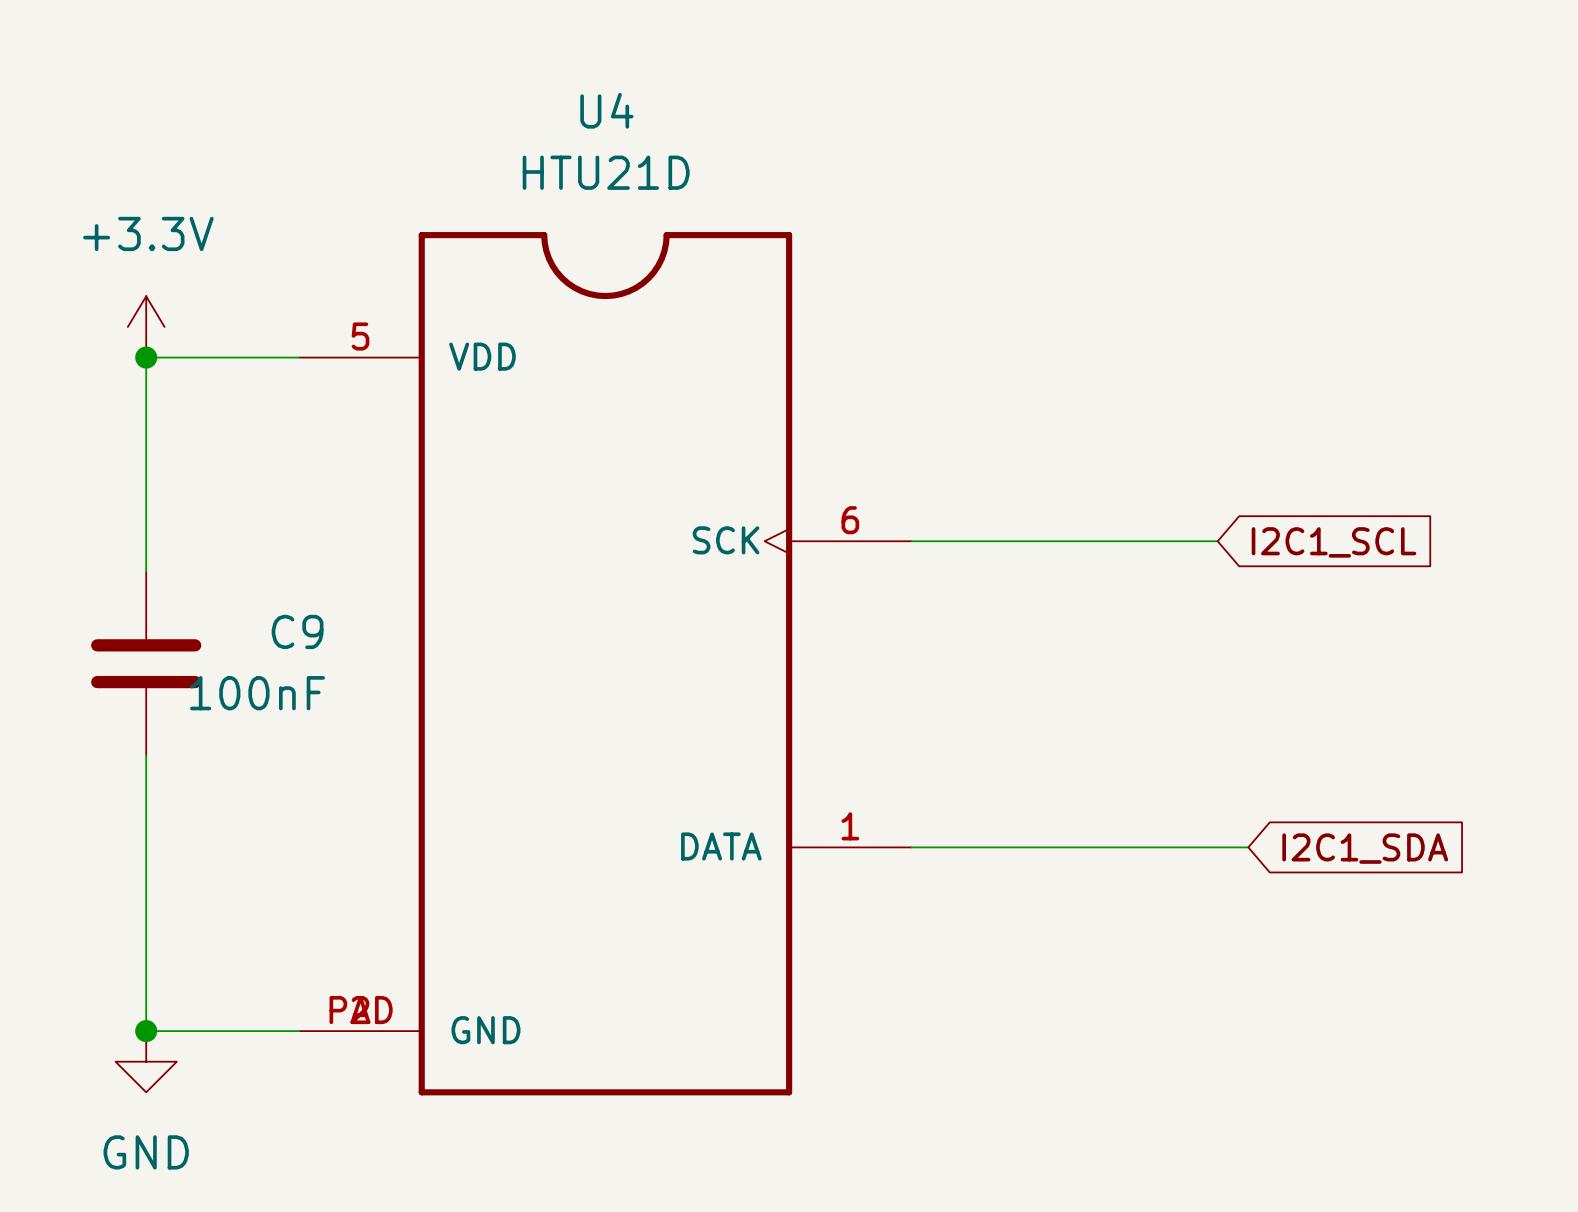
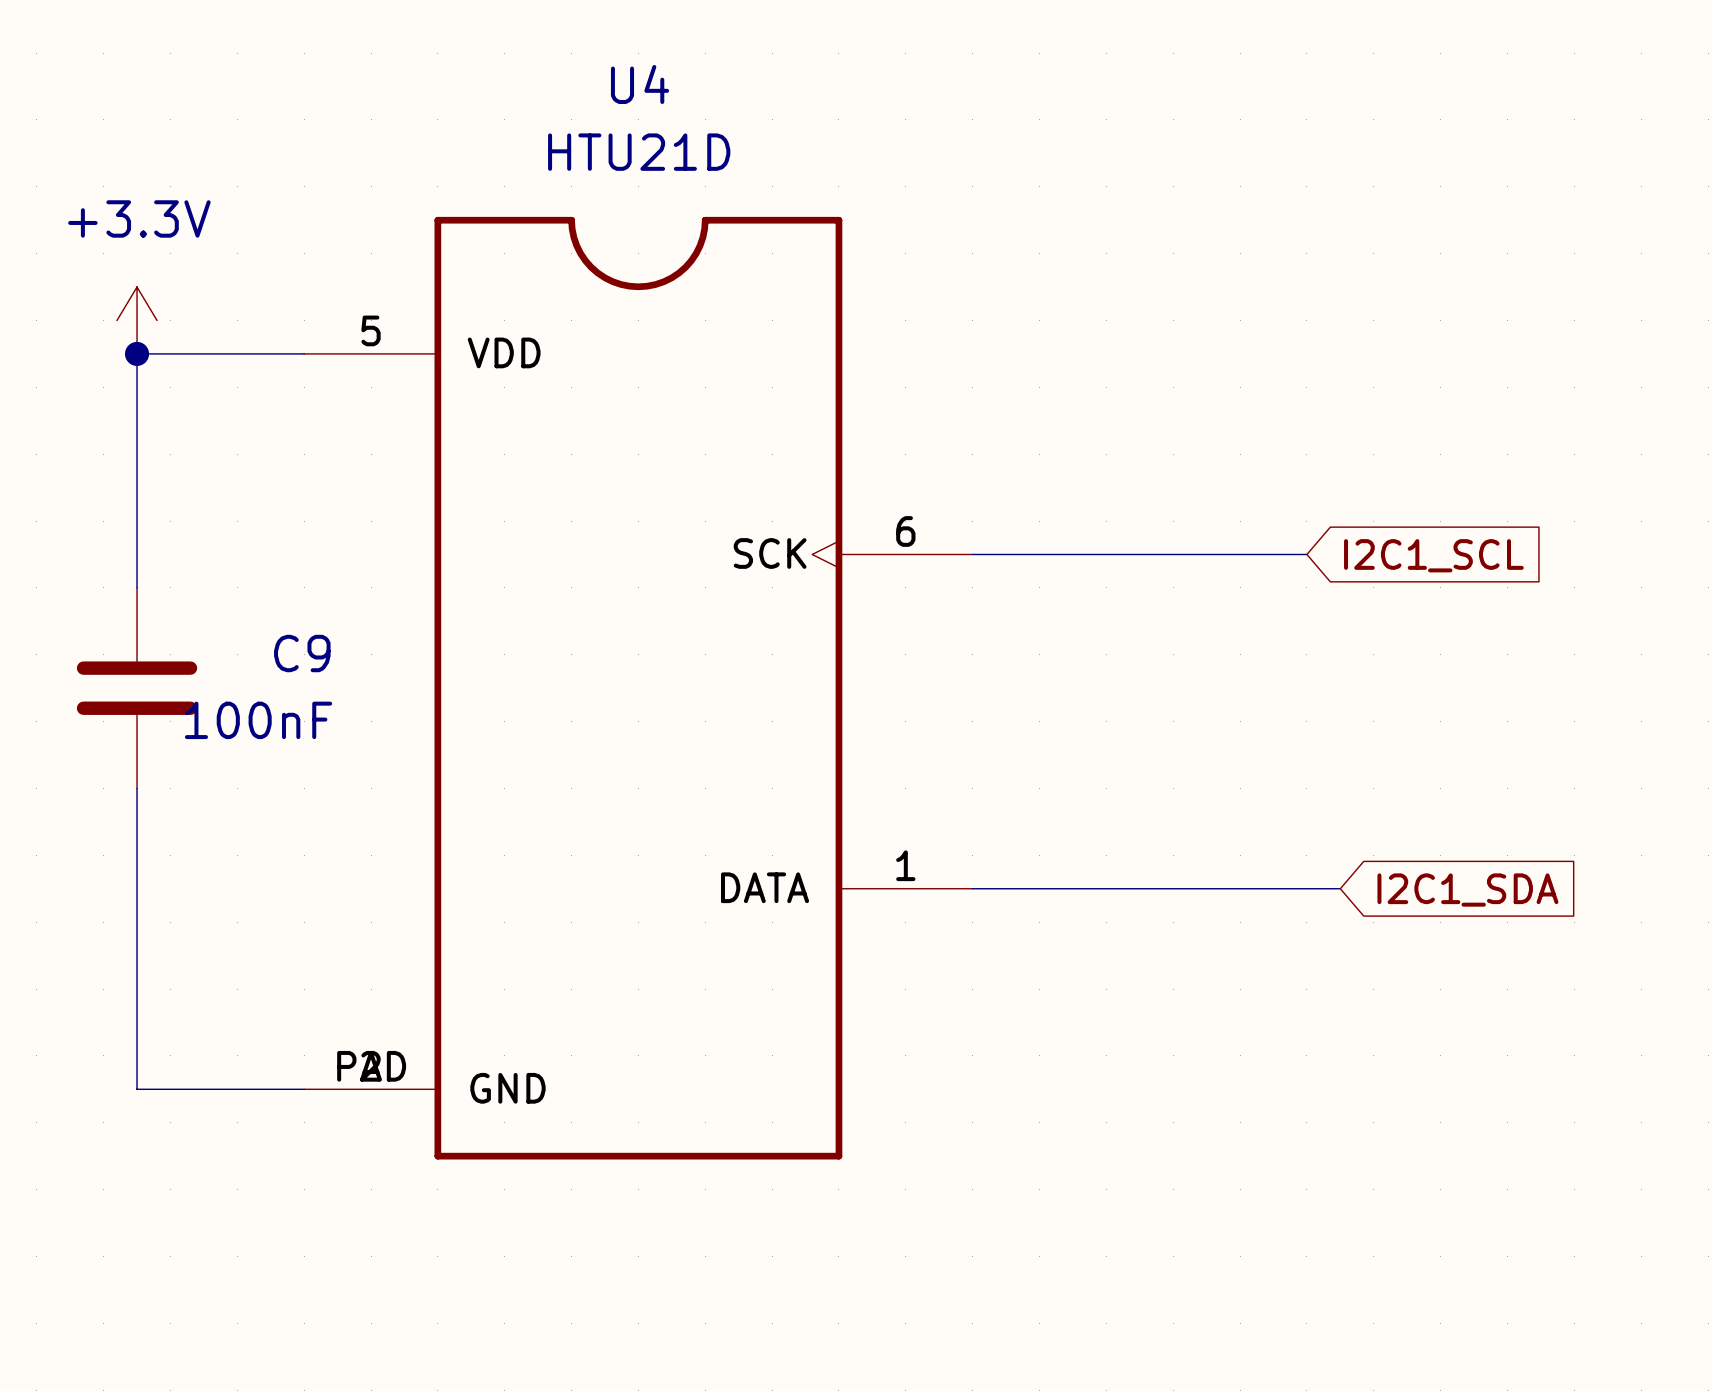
junction: (146, 1031) -> none
power symbol: GND (146, 1061) -> none

